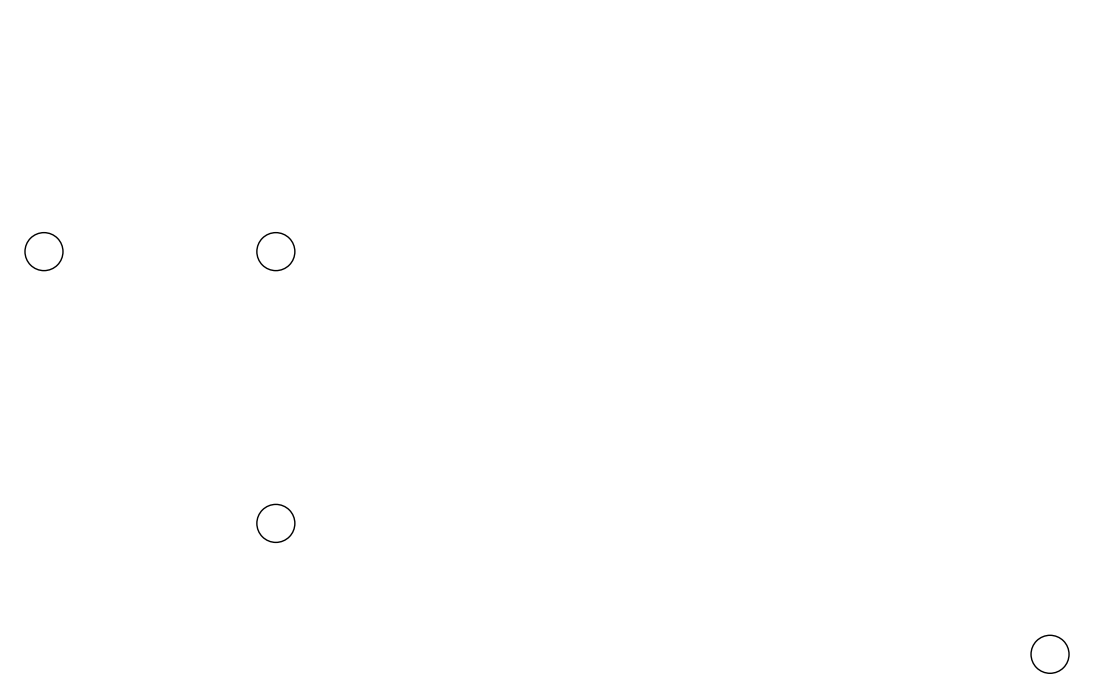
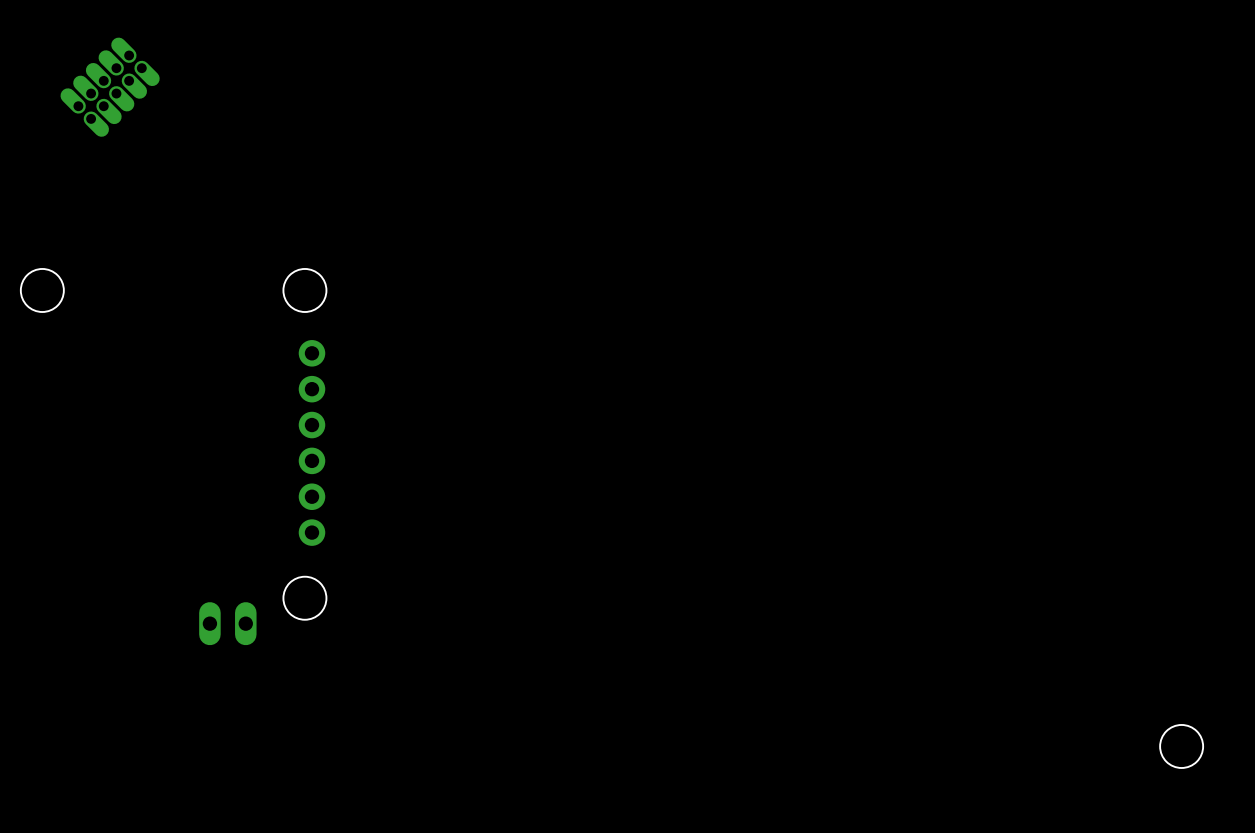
part: none -> (110, 87)
part: none -> (311, 442)
part: none -> (227, 623)

